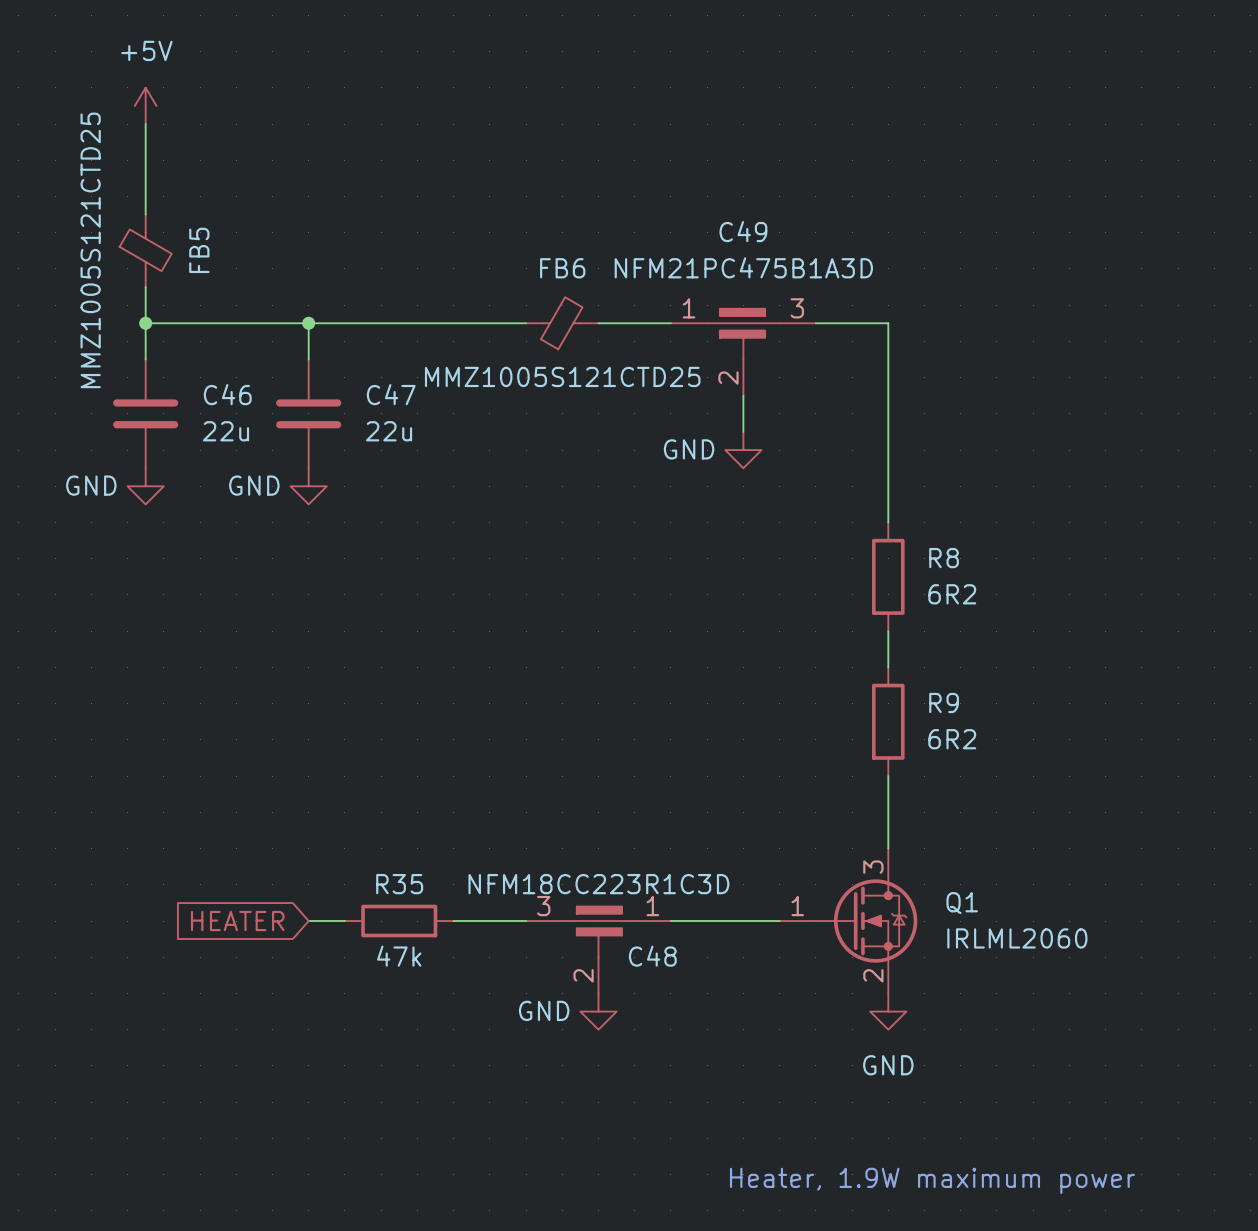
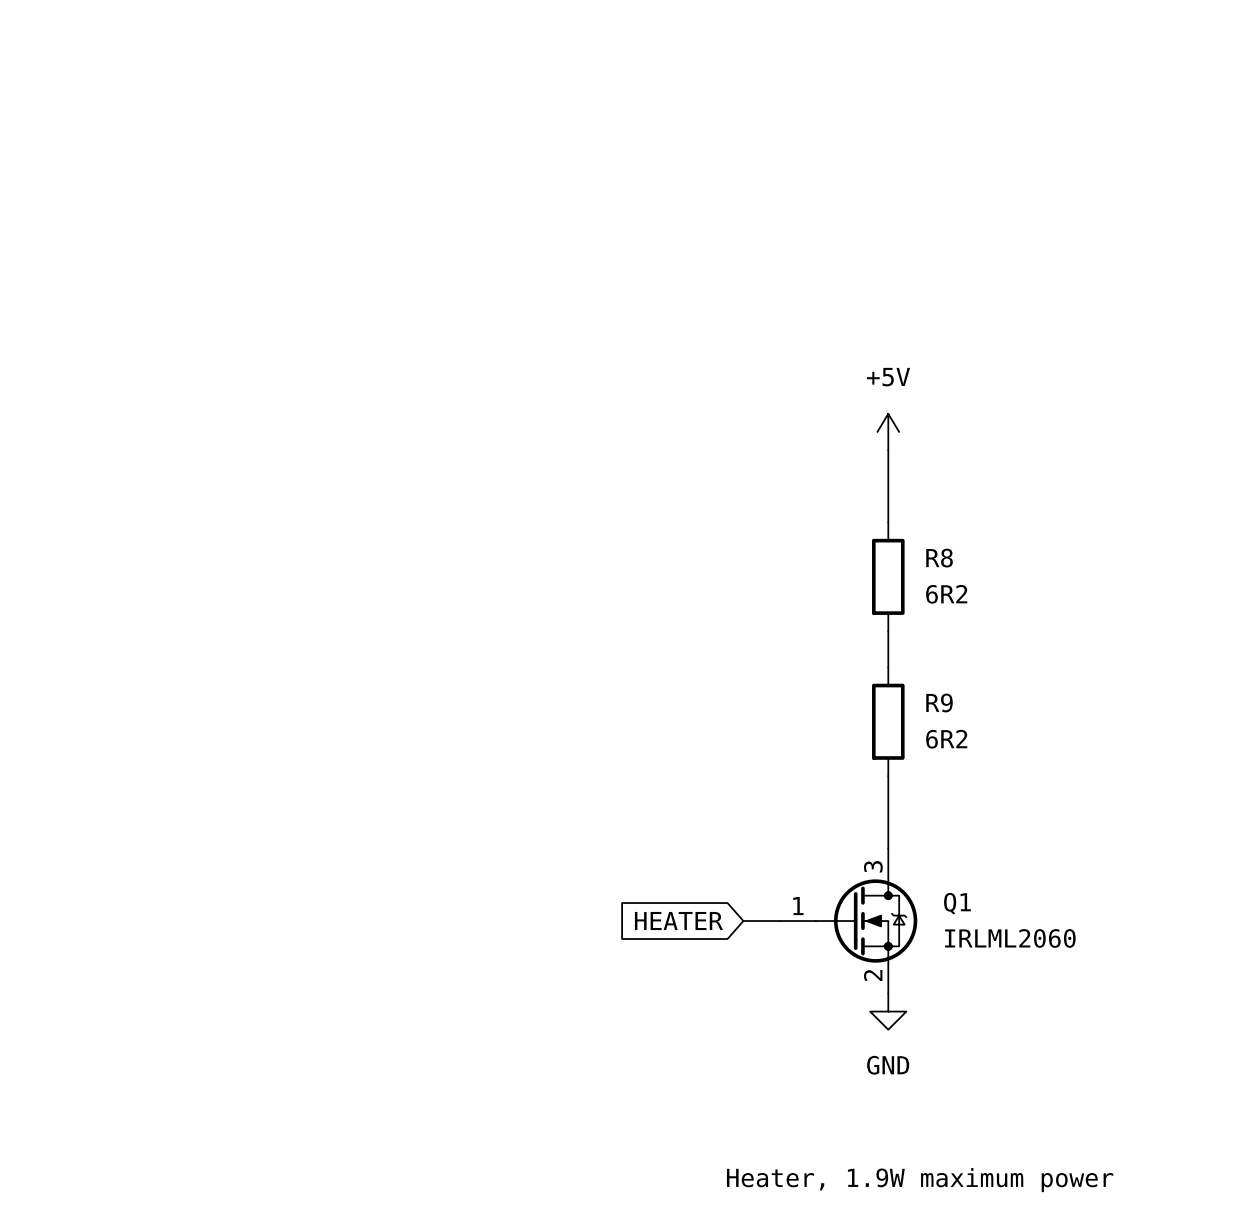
power symbol: +5V (145, 105) -> none
wire: (145, 124) (145, 214) -> none
FB5: MMZ1005S121CTD25 (145, 250) -> none
wire: (145, 287) (145, 359) -> none
wire: (145, 323) (526, 323) -> none
junction: (145, 323) -> none
wire: (308, 323) (308, 359) -> none
junction: (308, 323) -> none
FB6: MMZ1005S121CTD25 (562, 323) -> none
wire: (598, 323) (670, 323) -> none
wire: (815, 323) (888, 323) (888, 450) -> none
C49: NFM21PC475B1A3D (743, 352) -> none
wire: (743, 395) (743, 431) -> none
C46: 22u (145, 413) -> none
C47: 22u (308, 413) -> none
power symbol: none -> +5V (888, 431)
power symbol: GND (743, 450) -> none
power symbol: GND (145, 486) -> none
power symbol: GND (308, 486) -> none
global label: HEATER (237, 921) -> none
wire: (308, 921) (344, 921) -> none
R35: 47k (399, 921) -> none
wire: (453, 921) (526, 921) -> none
wire: (670, 921) (743, 921) -> none
global label: none -> HEATER (678, 921)
C48: NFM18CC223R1C3D (598, 949) -> none
power symbol: GND (598, 1011) -> none

